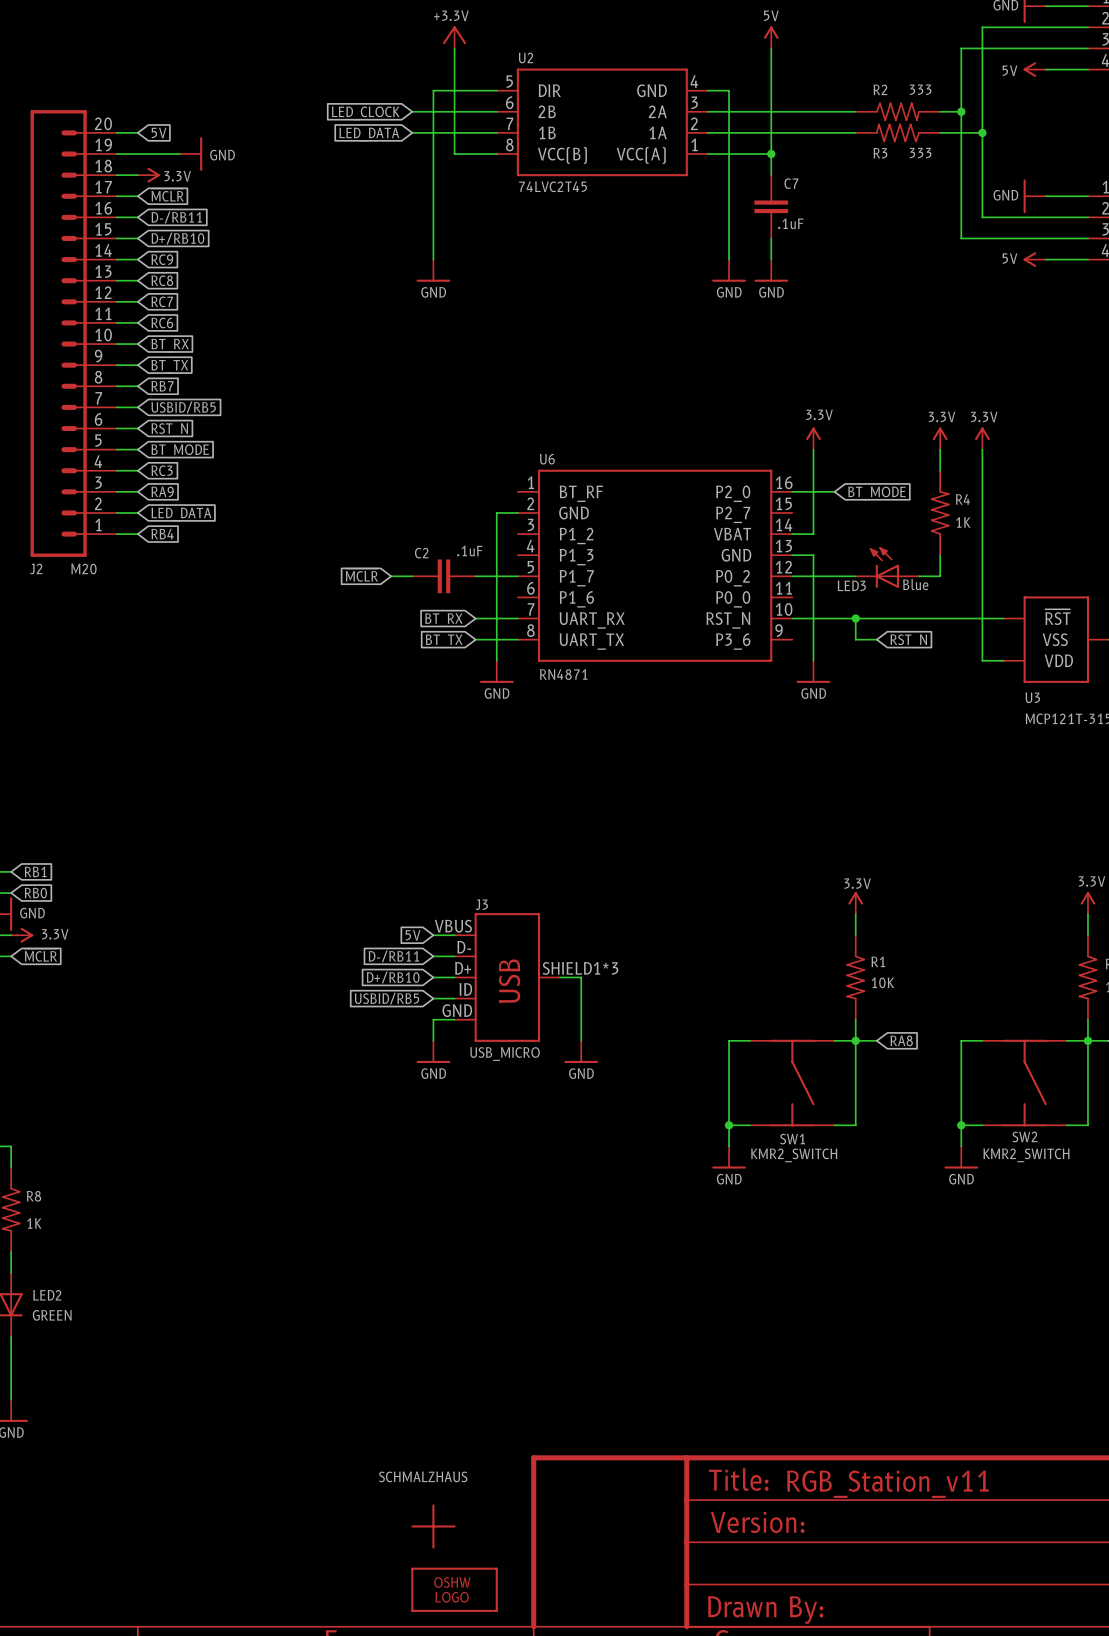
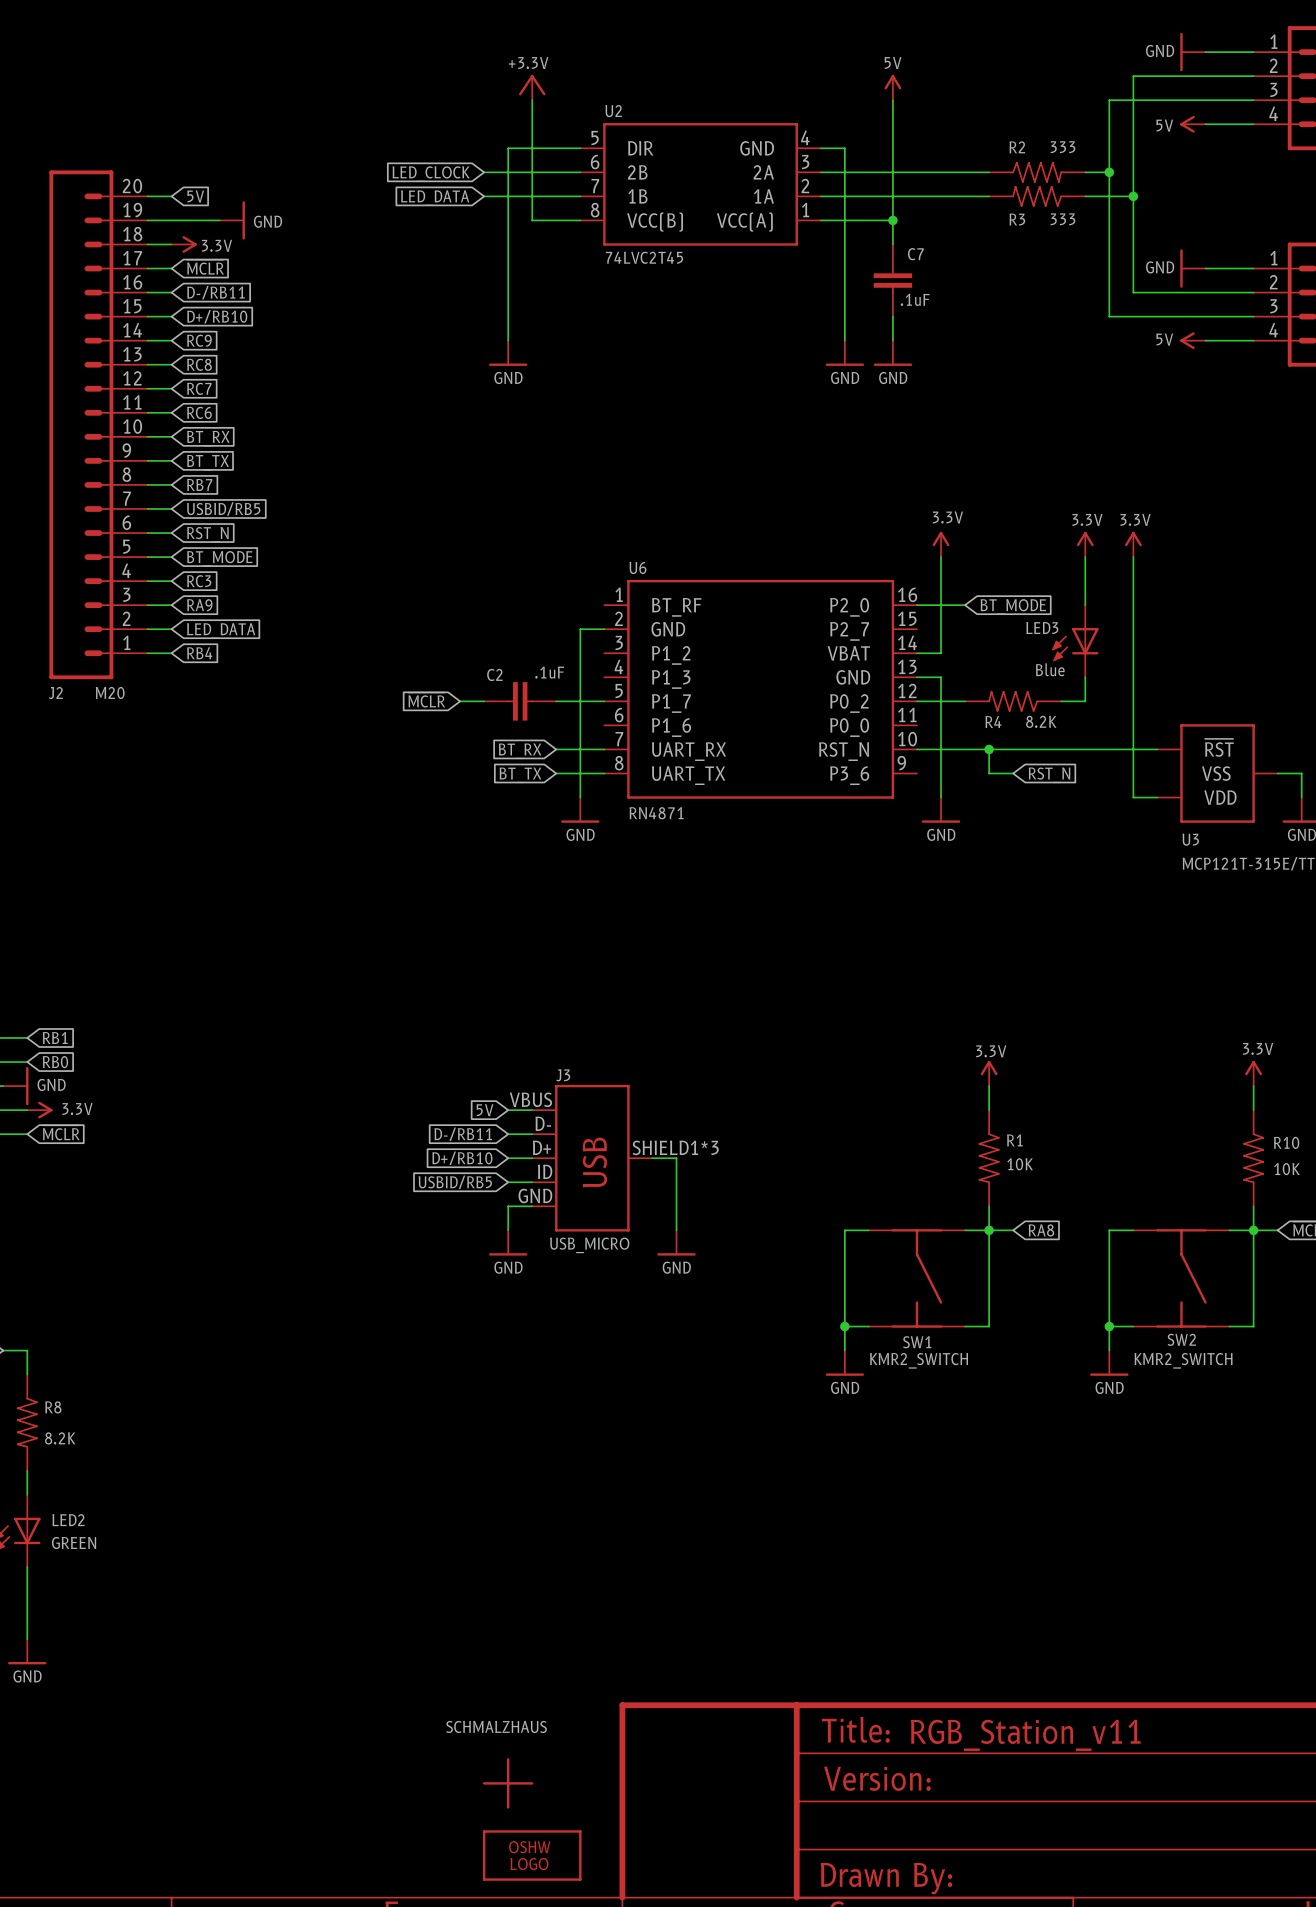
R4 name position: R4 (962, 499) -> R4 (993, 722)
R4 rotation: 0° (940, 512) -> 90° counterclockwise (1013, 701)
R4 position: (940, 512) -> (1013, 701)
R4 value: 1K (963, 522) -> 8.2K (1041, 721)
LED3 rotation: 0° (884, 567) -> 90° counterclockwise (1075, 644)
LED3 position: (887, 567) -> (1075, 641)
LED3 value position: Blue (915, 584) -> Blue (1050, 669)
LED3 name position: LED3 (851, 585) -> LED3 (1042, 628)
R8 value: 1K (34, 1223) -> 8.2K (60, 1438)

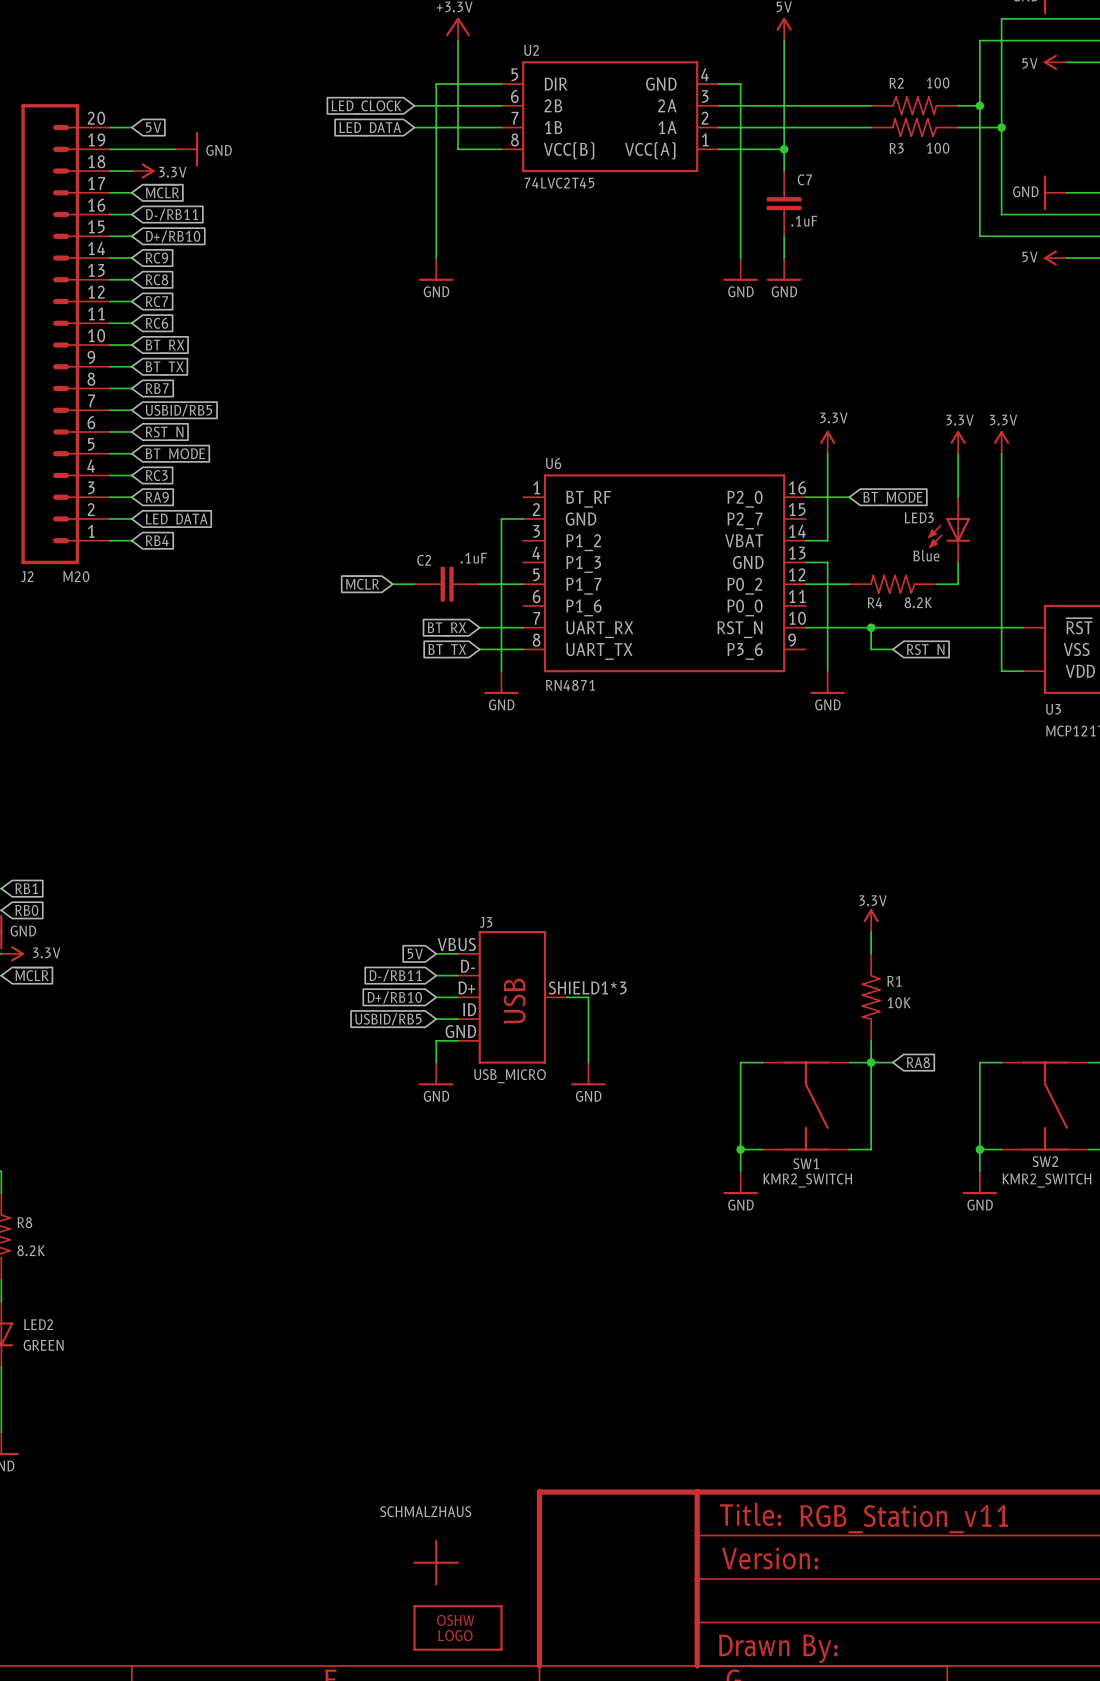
R2 value: 333 (1062, 147) -> 100 (938, 83)
R3 value: 333 (1062, 219) -> 100 (938, 148)

